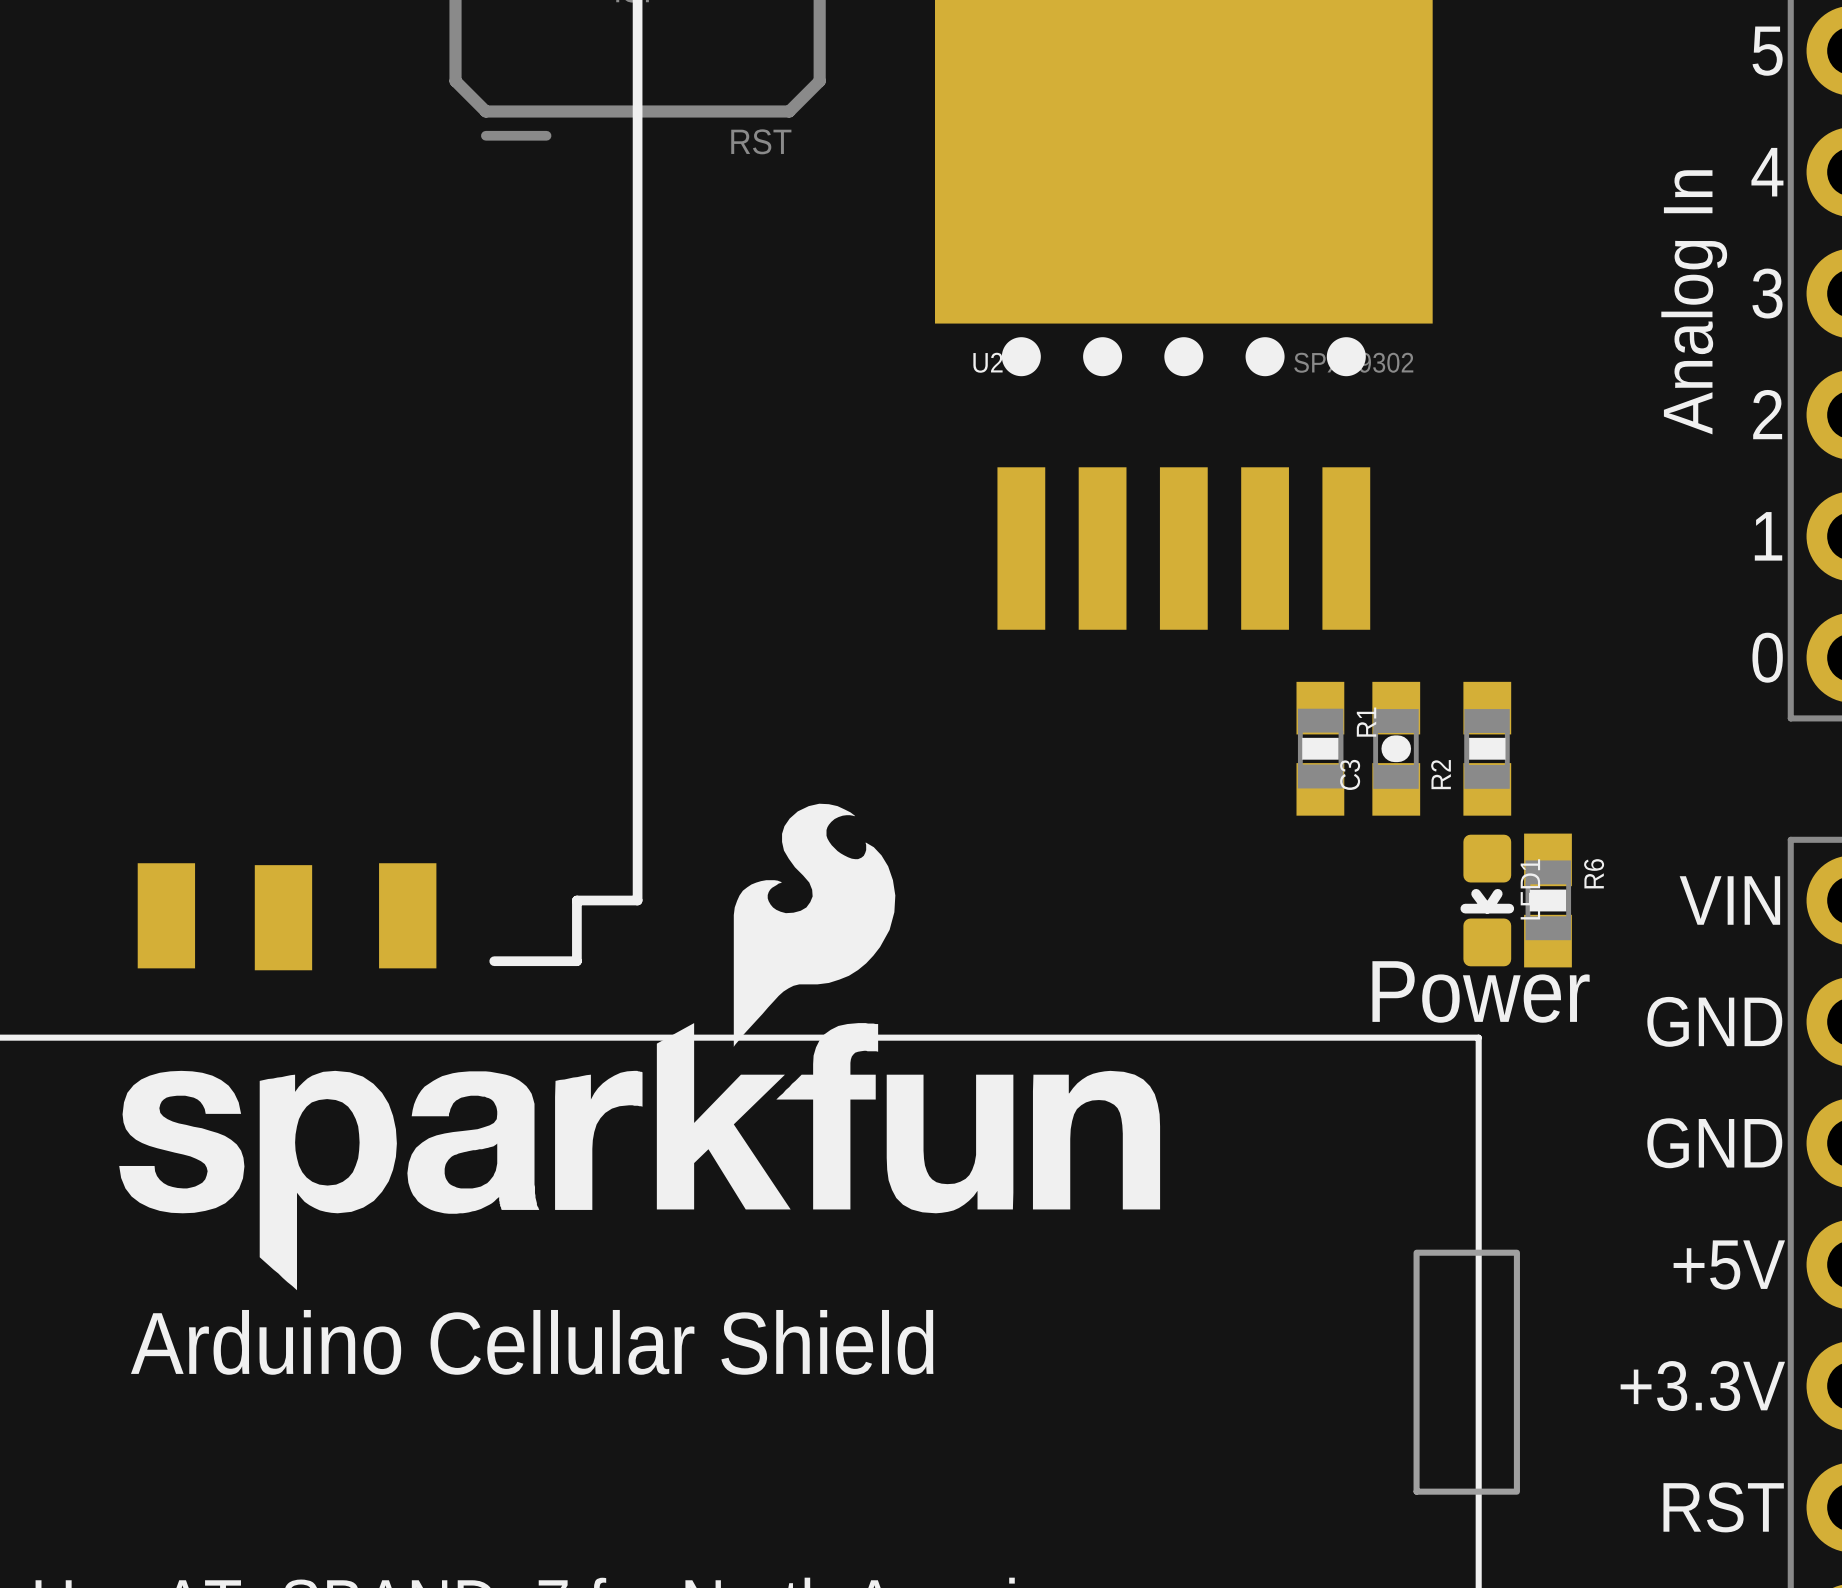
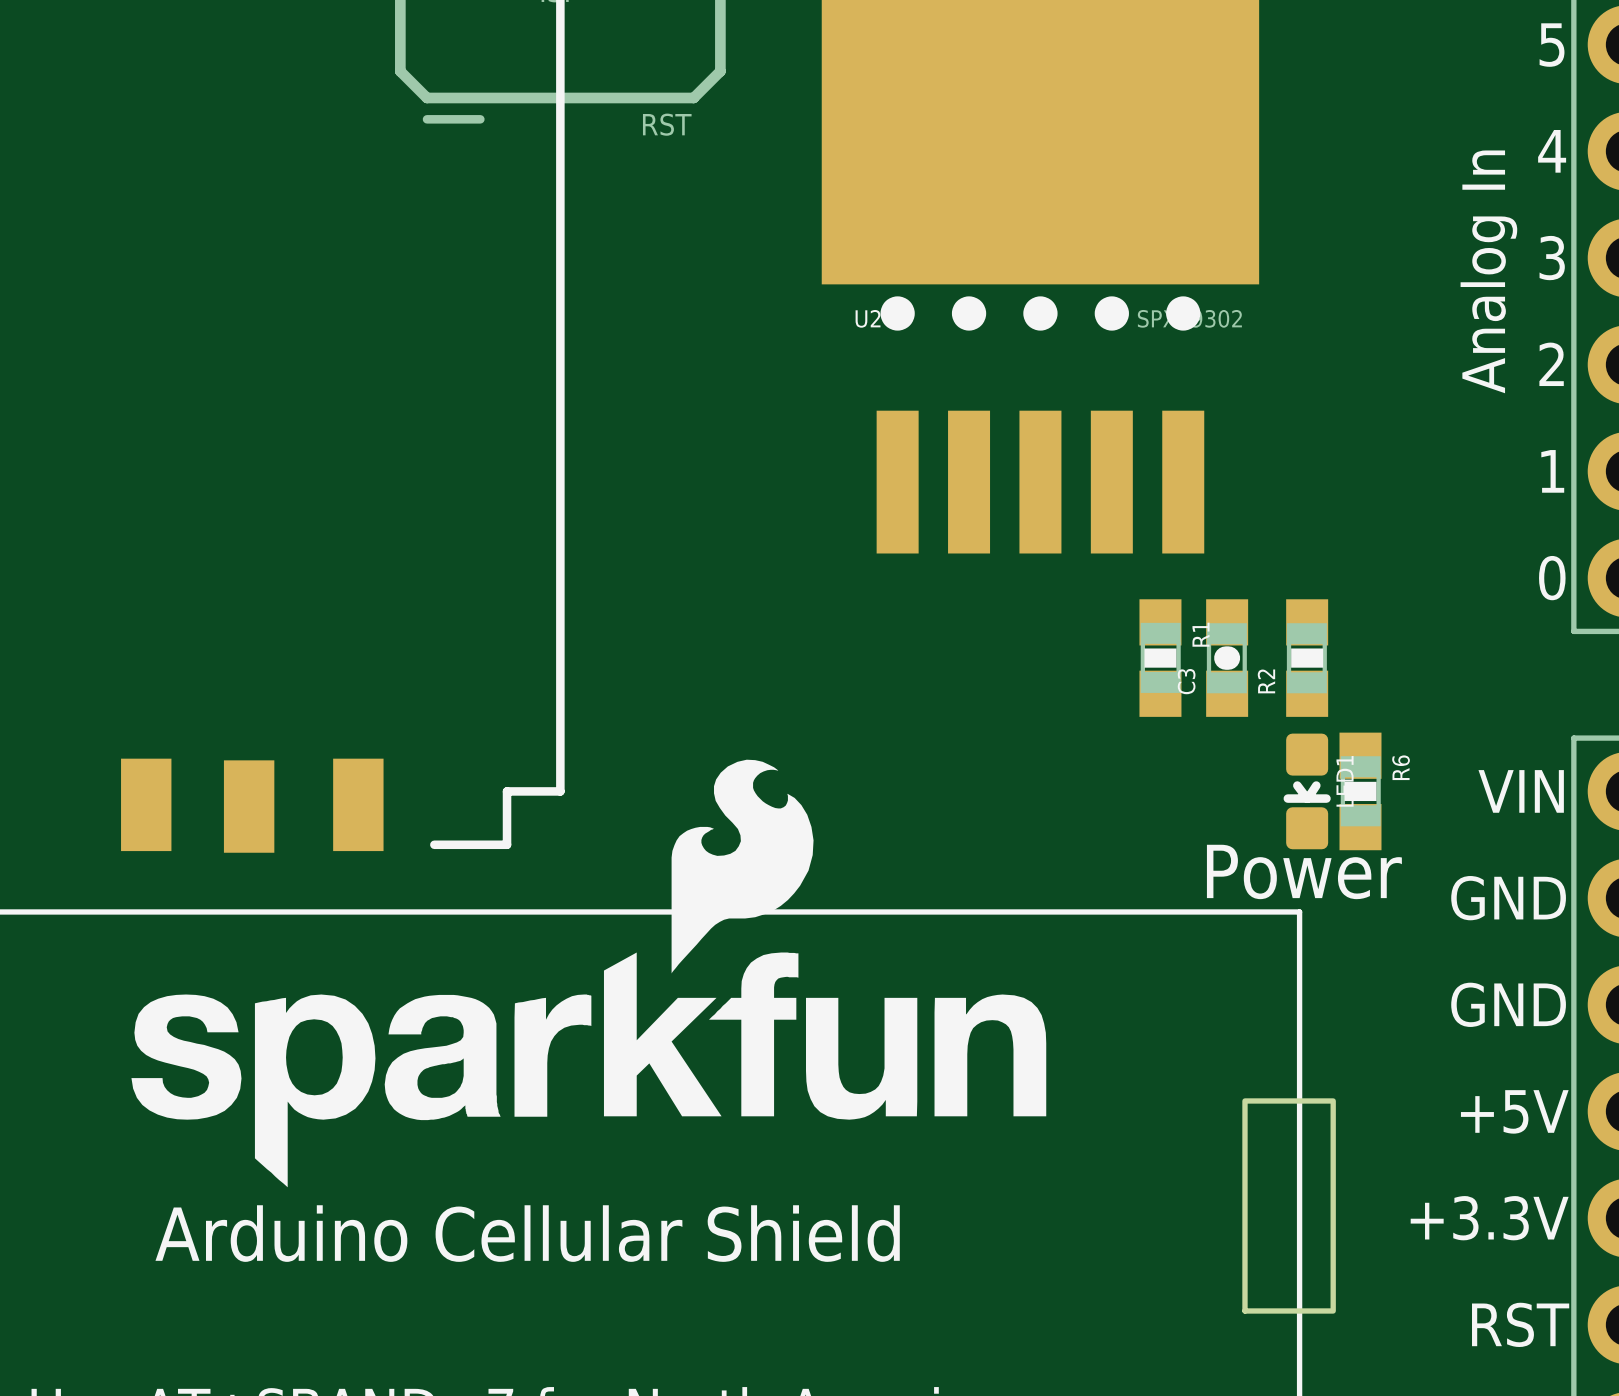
drawing position: (639, 1046) -> (588, 973)
text position: Arduino Cellular Shield (532, 1342) -> Arduino Cellular Shield (527, 1233)

